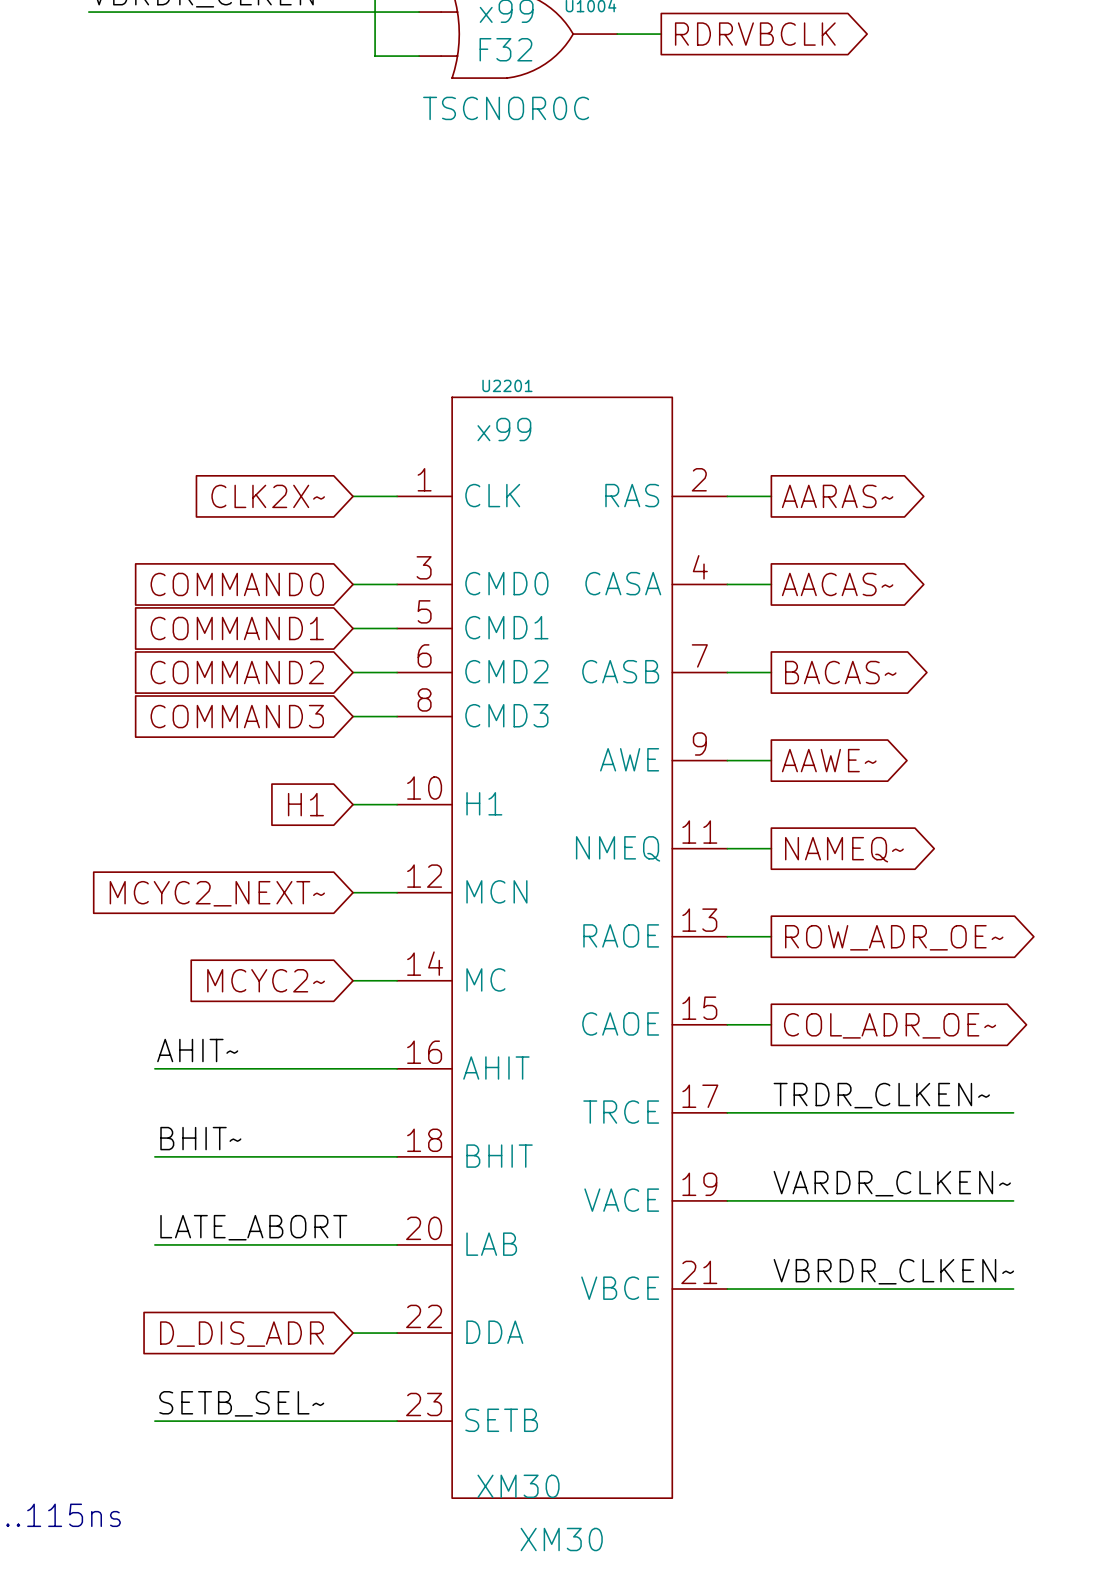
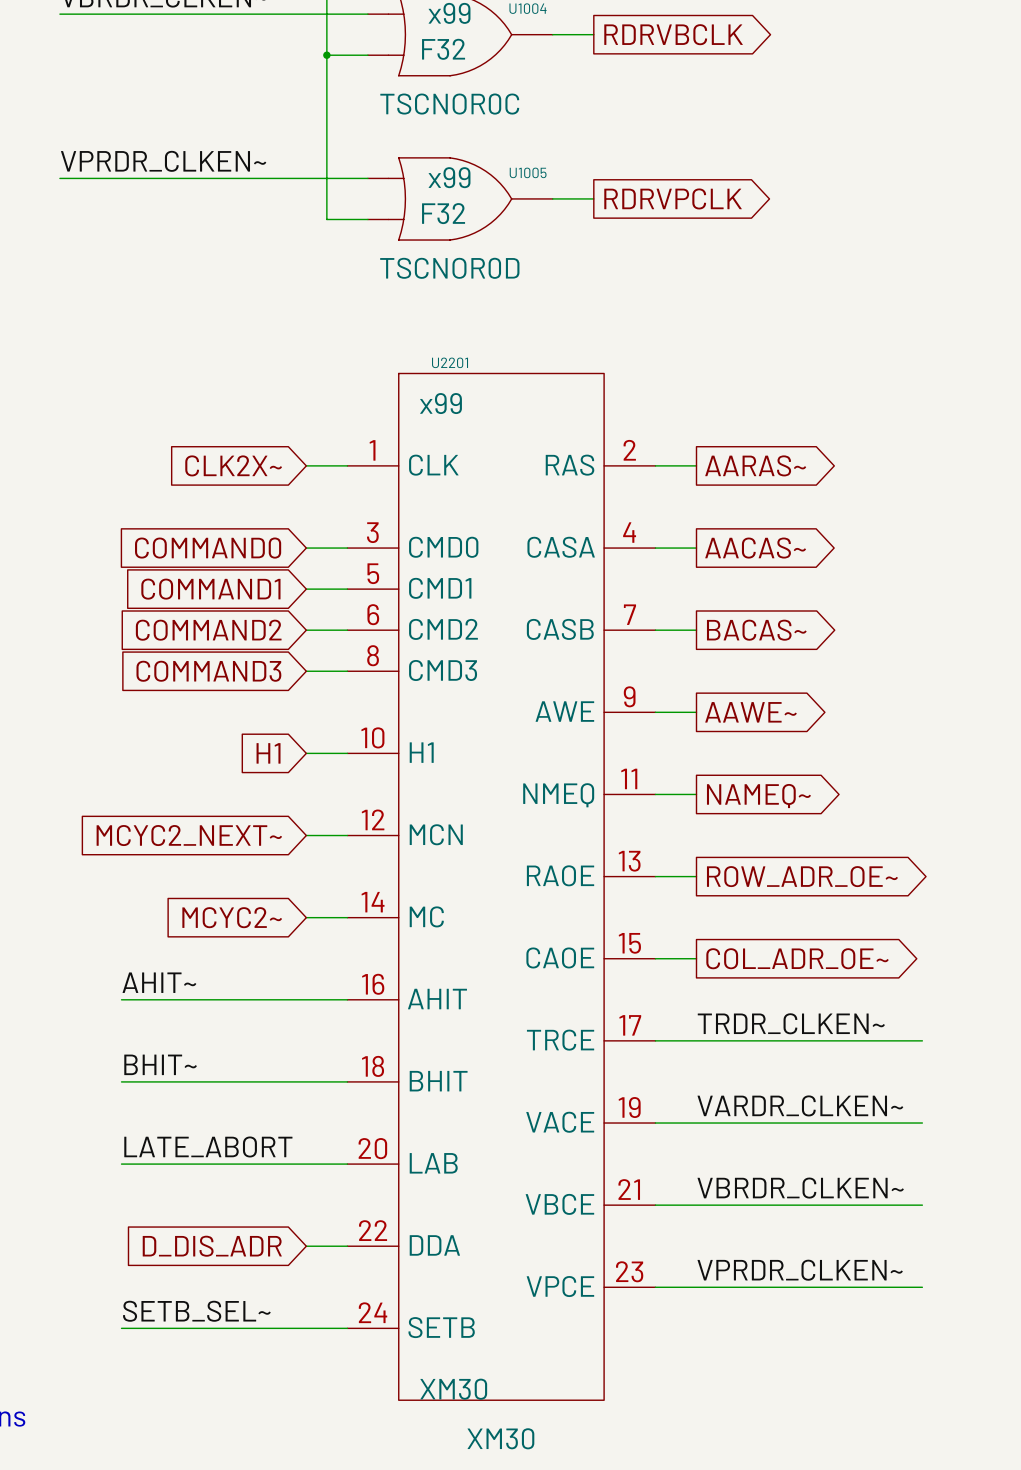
wire: none -> (326, 55) (326, 219) (367, 219)
junction: none -> (326, 55)
label: none -> VPRDR_CLKEN~ (163, 161)
wire: none -> (59, 178) (367, 178)
U1005: none -> F32 (460, 198)
wire: none -> (552, 198) (593, 198)
global label: none -> RDRVPCLK (673, 198)
U2201 symbol: [397, 397, 728, 1499] -> [347, 373, 656, 1401]
label: none -> VPRDR_CLKEN~ (800, 1270)
wire: none -> (655, 1287) (922, 1287)

